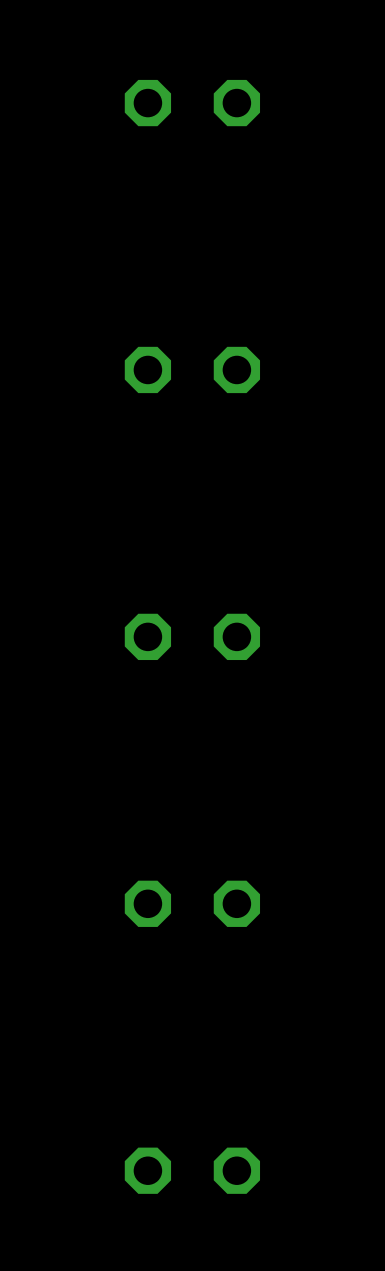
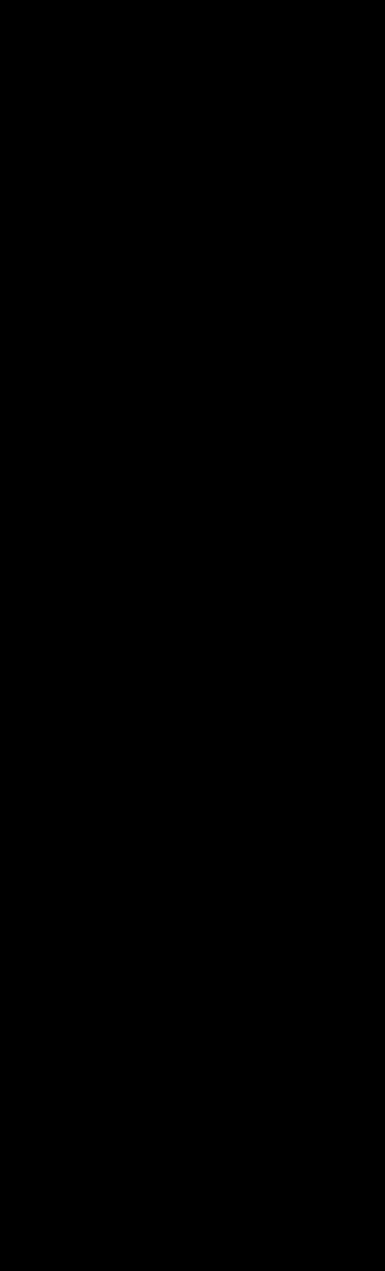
part: (192, 103) -> none
part: (192, 369) -> none
part: (192, 636) -> none
part: (192, 903) -> none
part: (192, 1170) -> none

